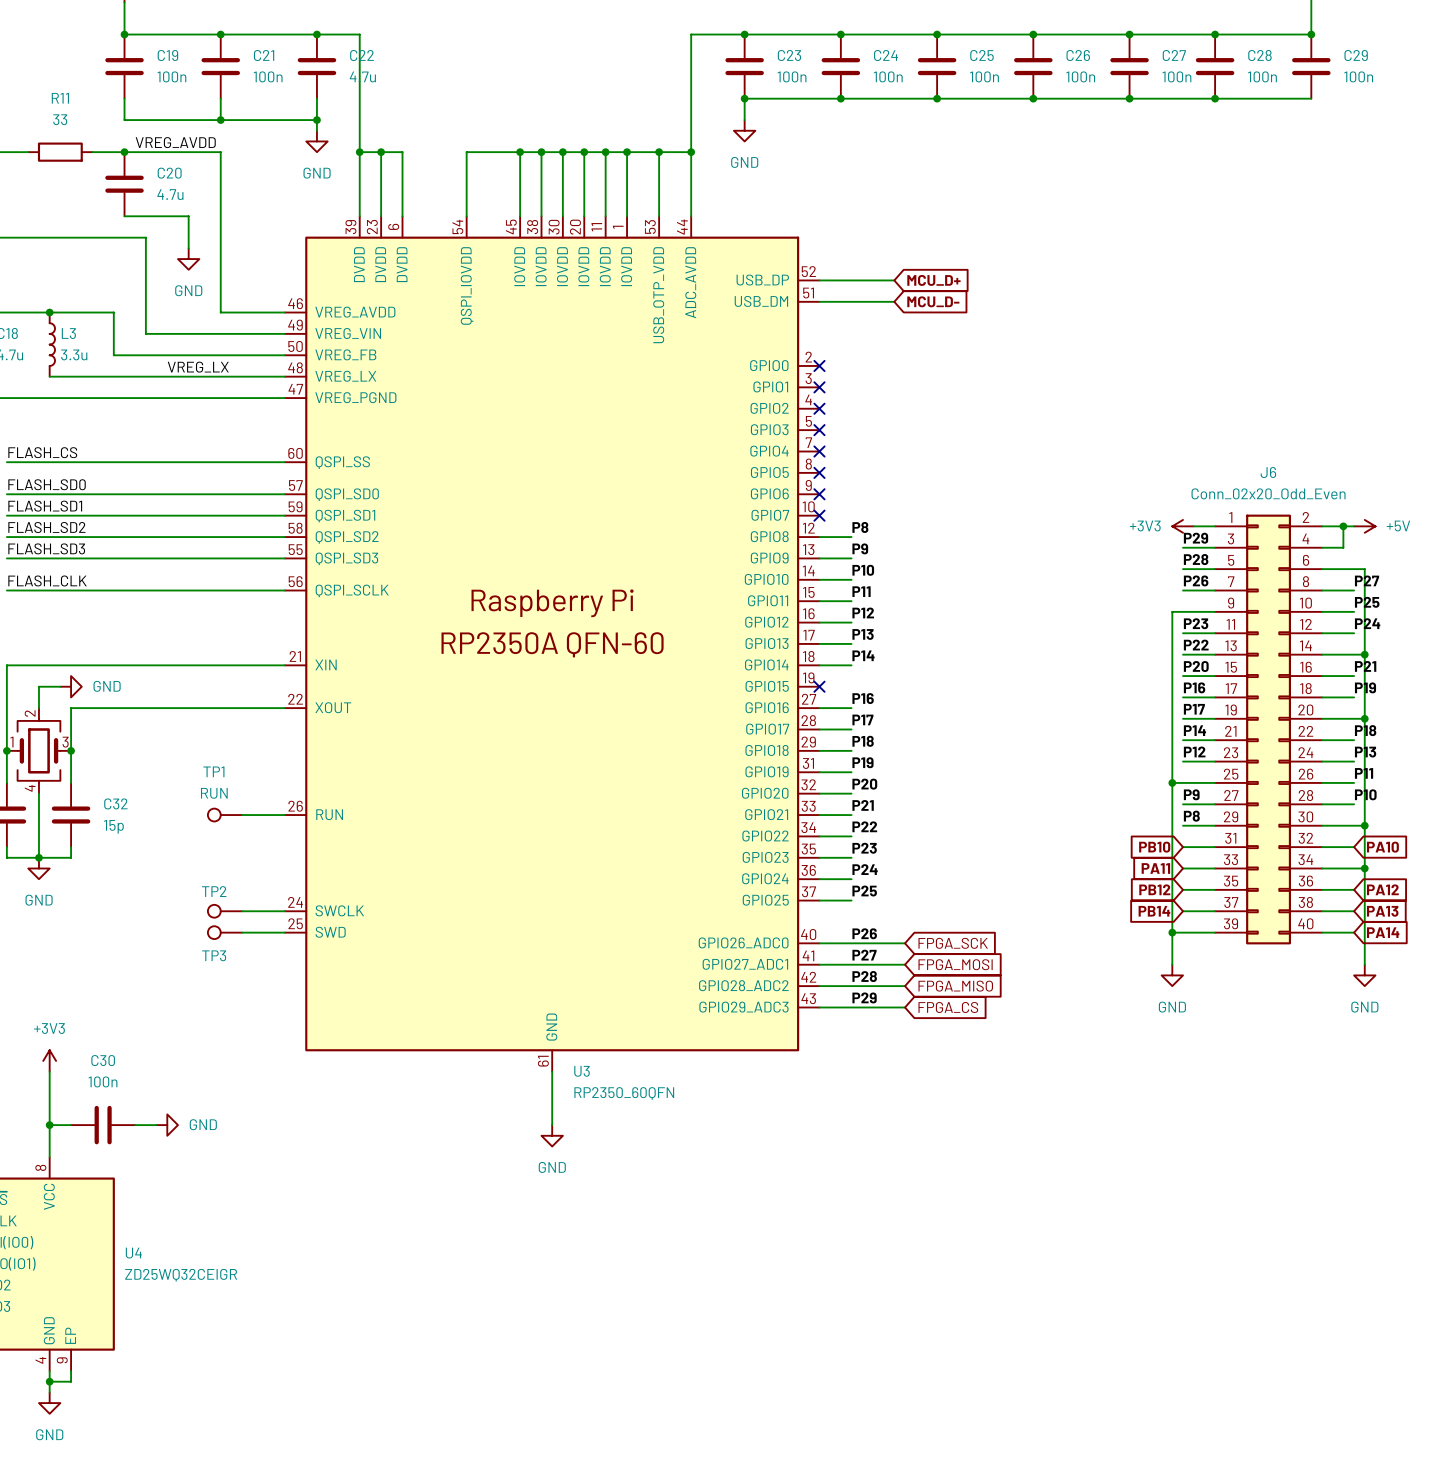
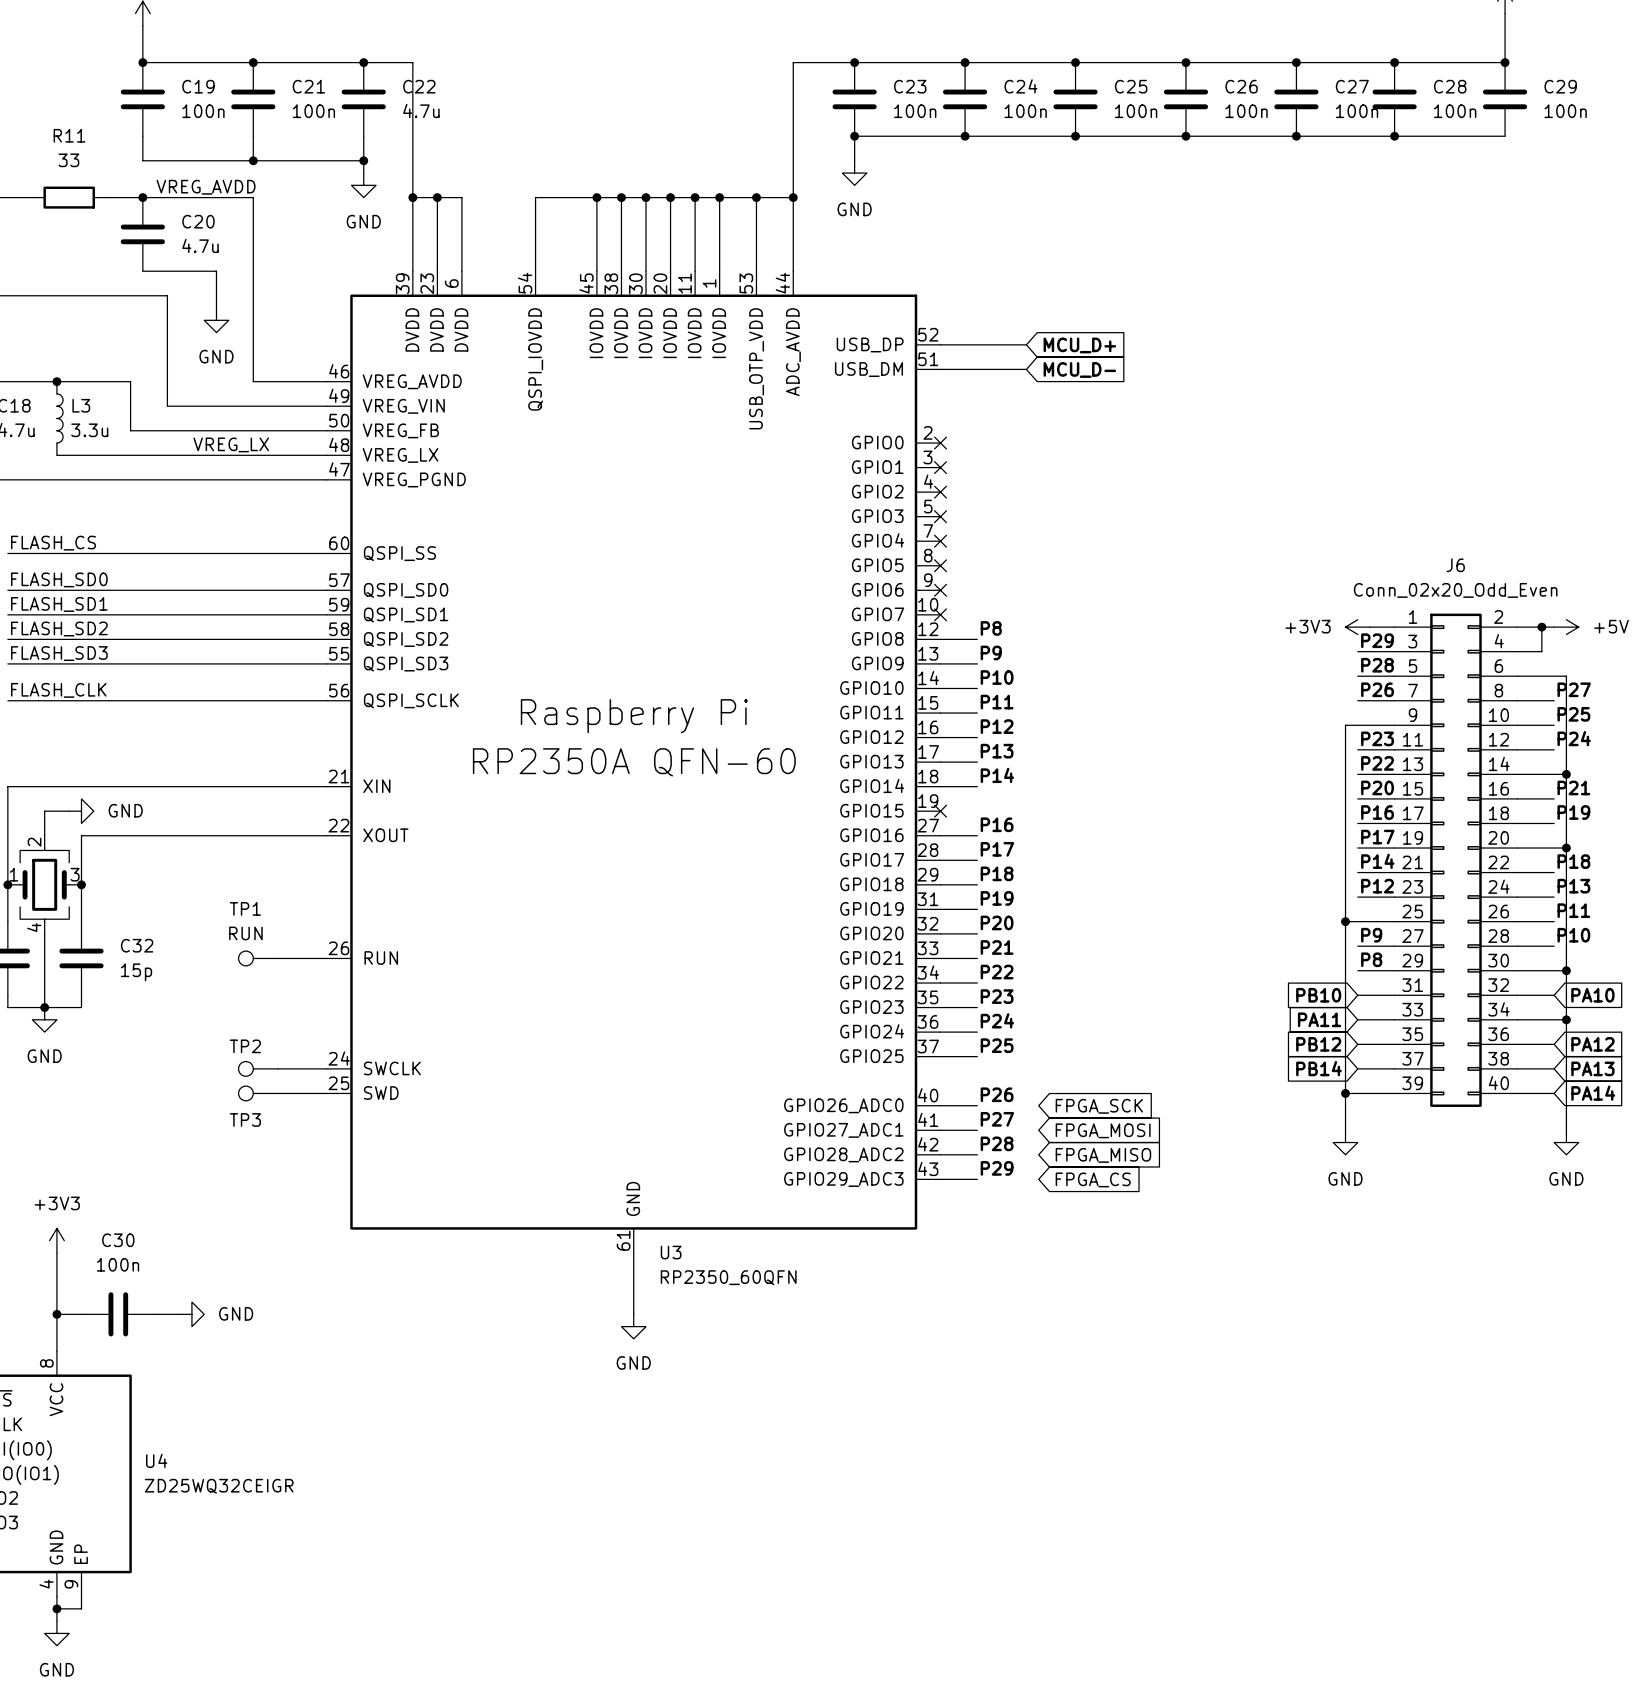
wire: (851, 943) (905, 943) -> none
wire: (851, 964) (905, 964) -> none
wire: (851, 986) (905, 986) -> none
wire: (851, 1007) (905, 1007) -> none

